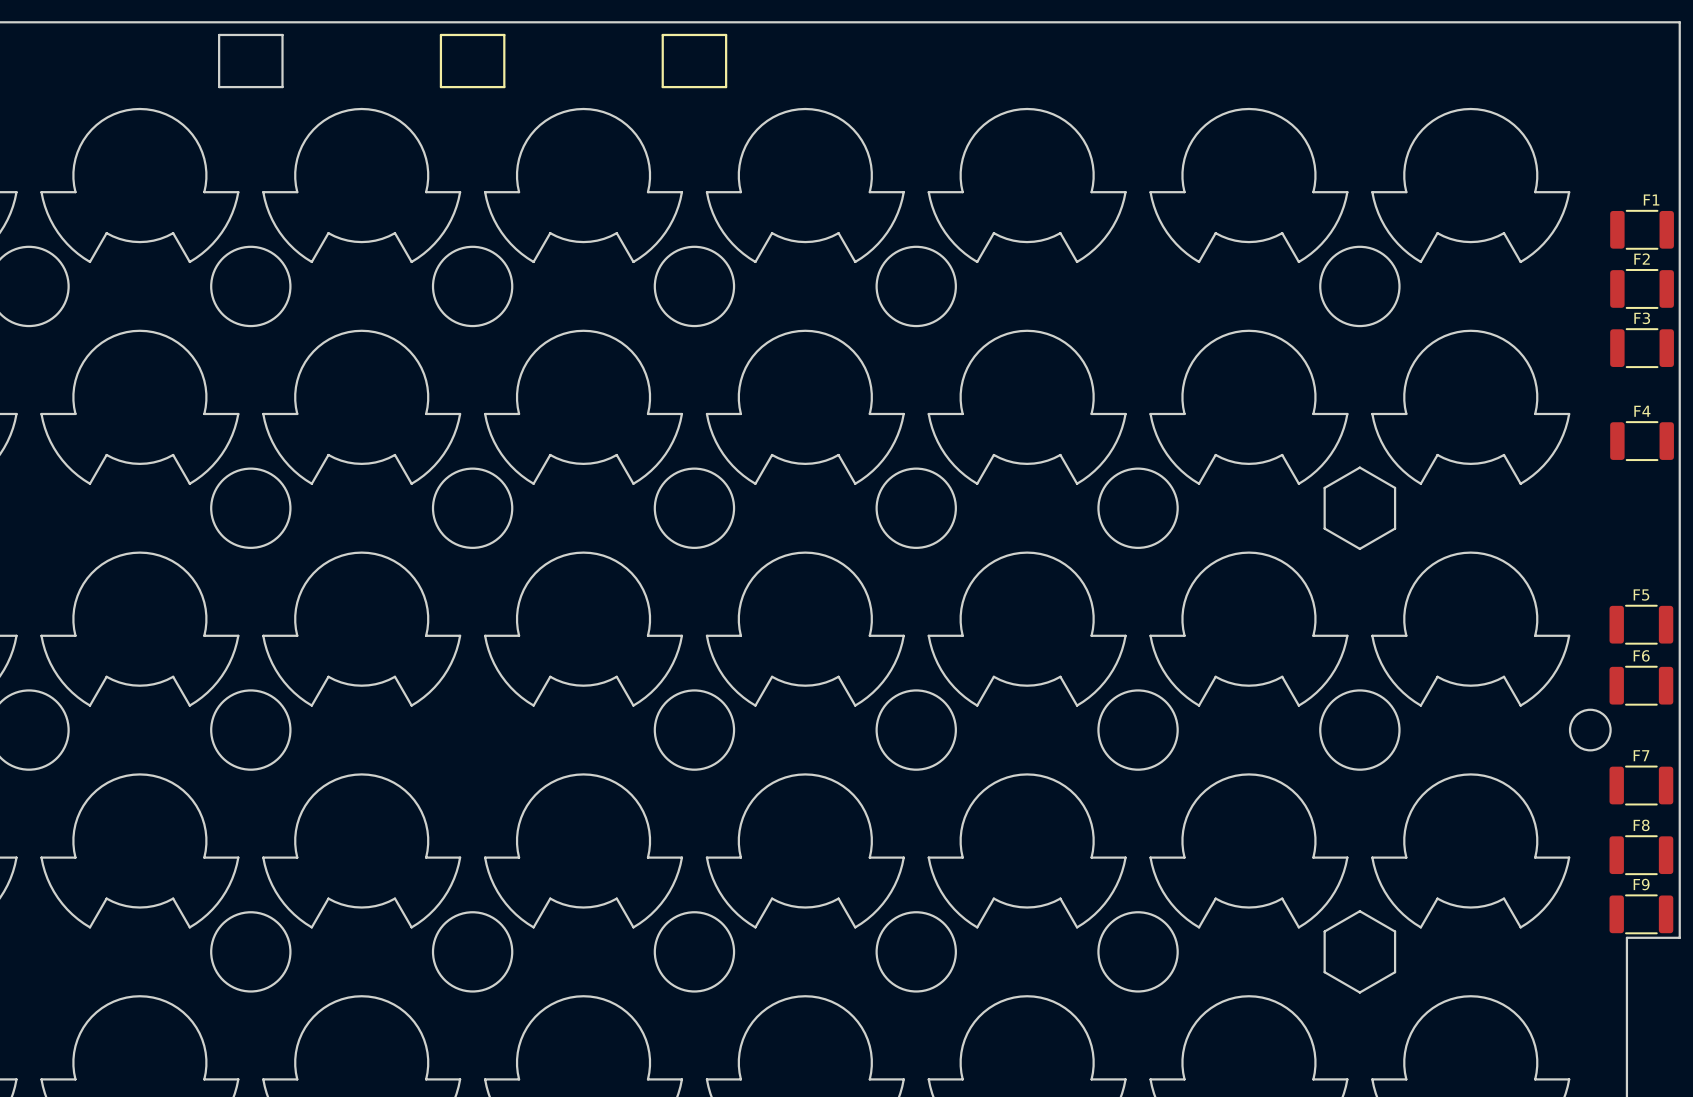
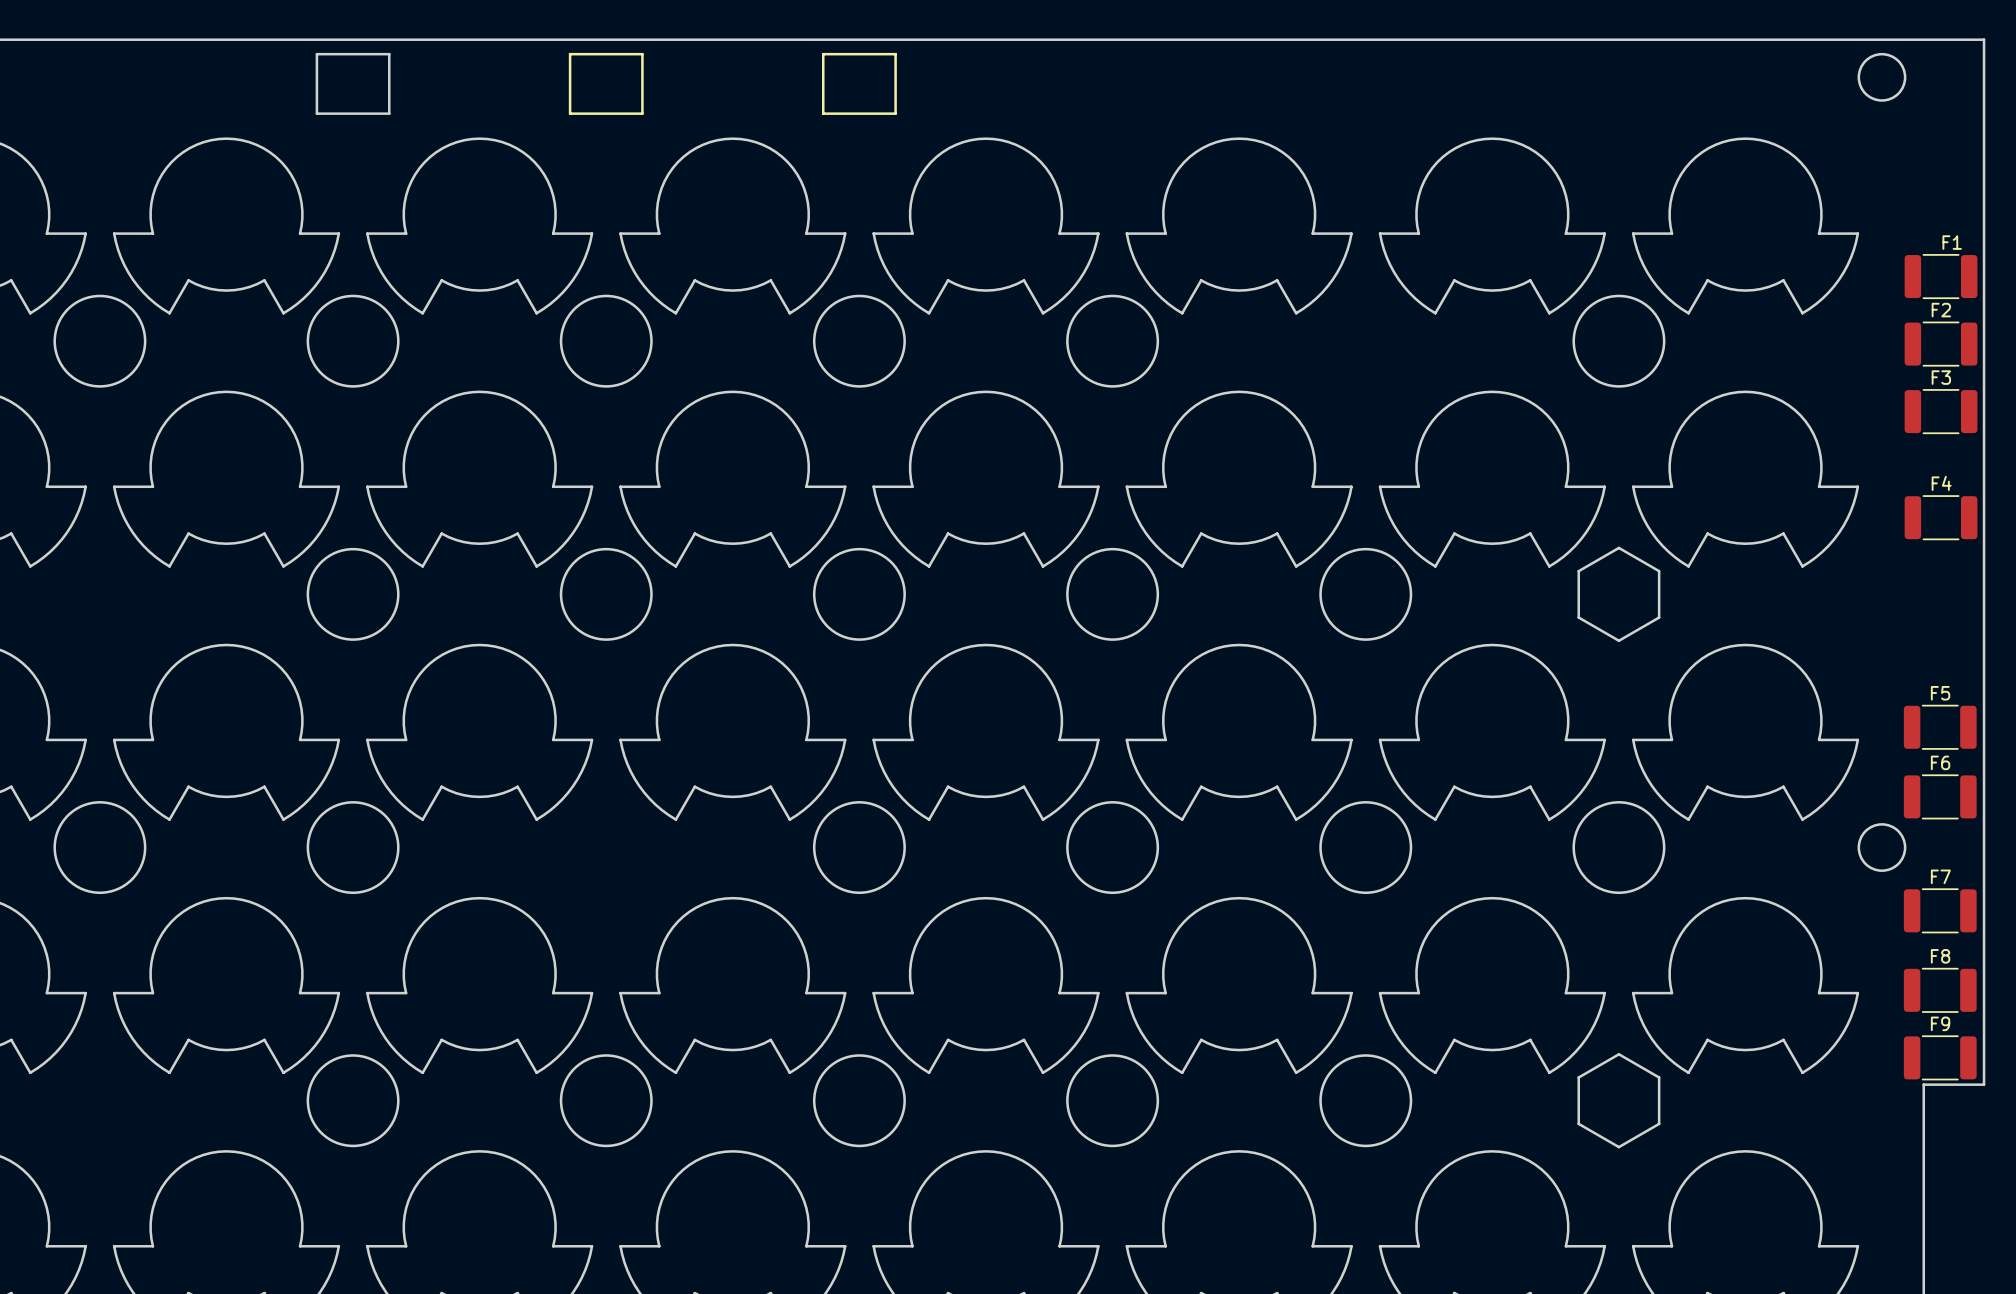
round board edge: none -> [1857, 52, 1907, 102]

